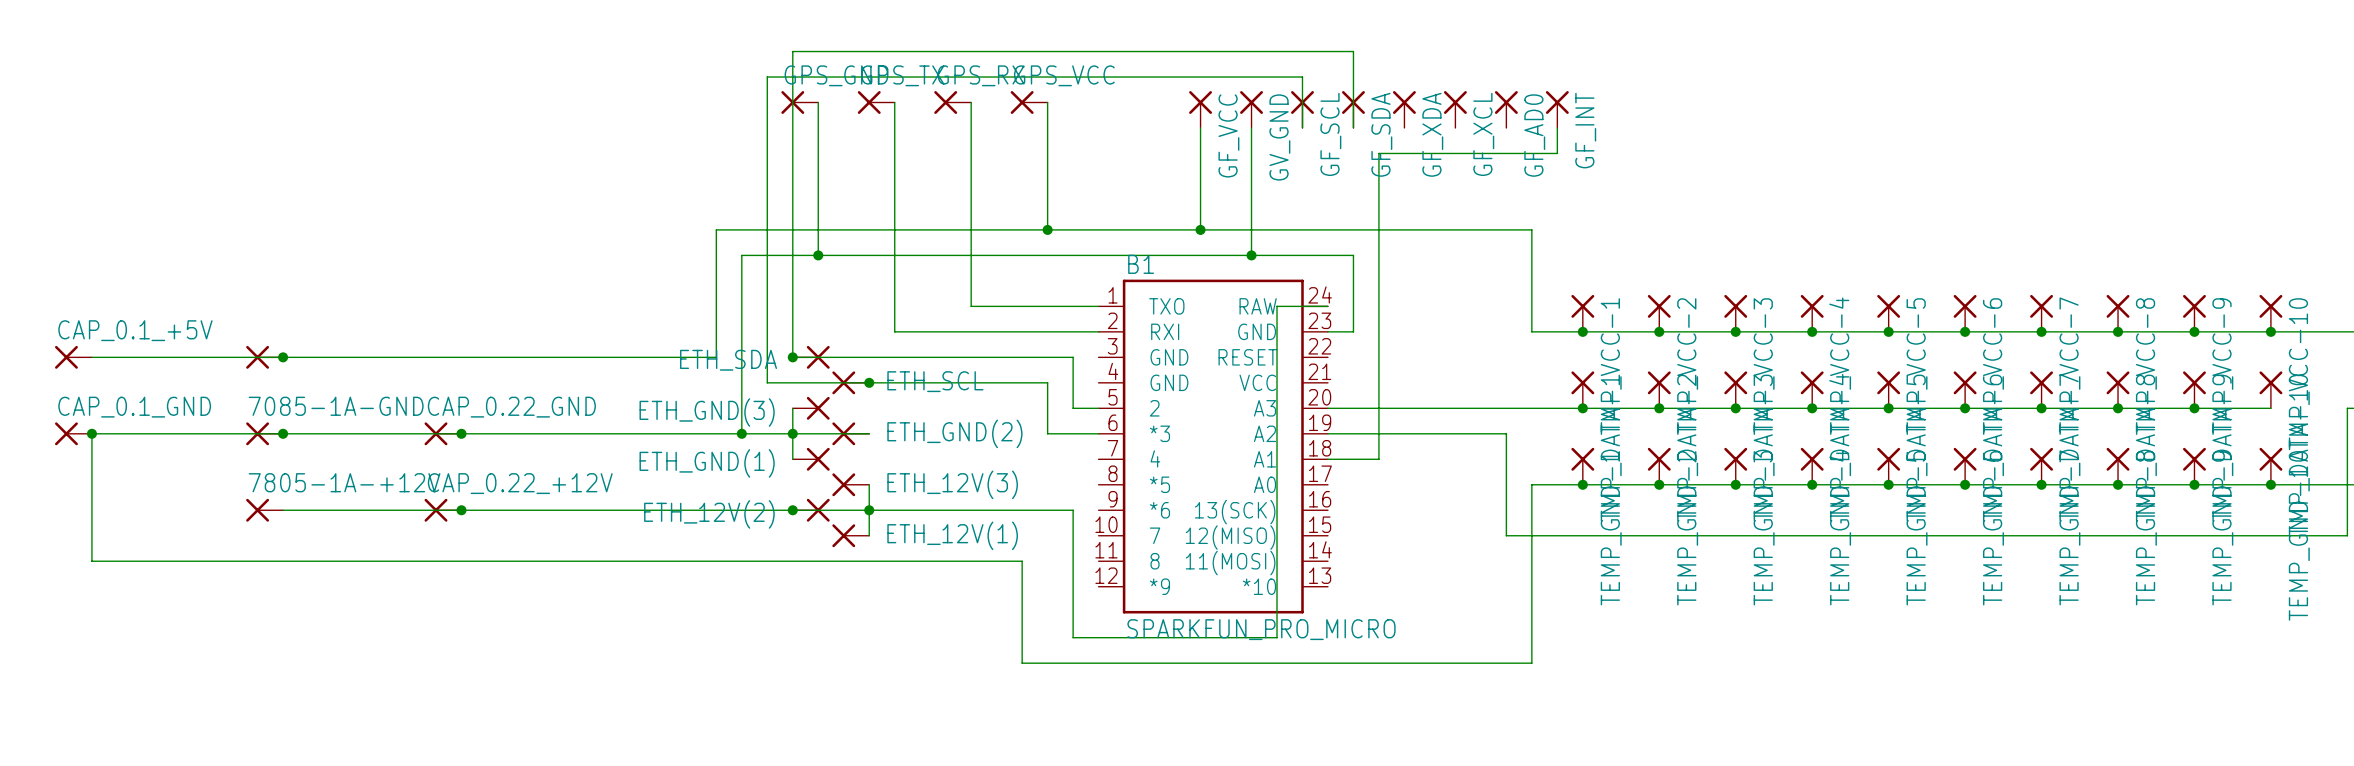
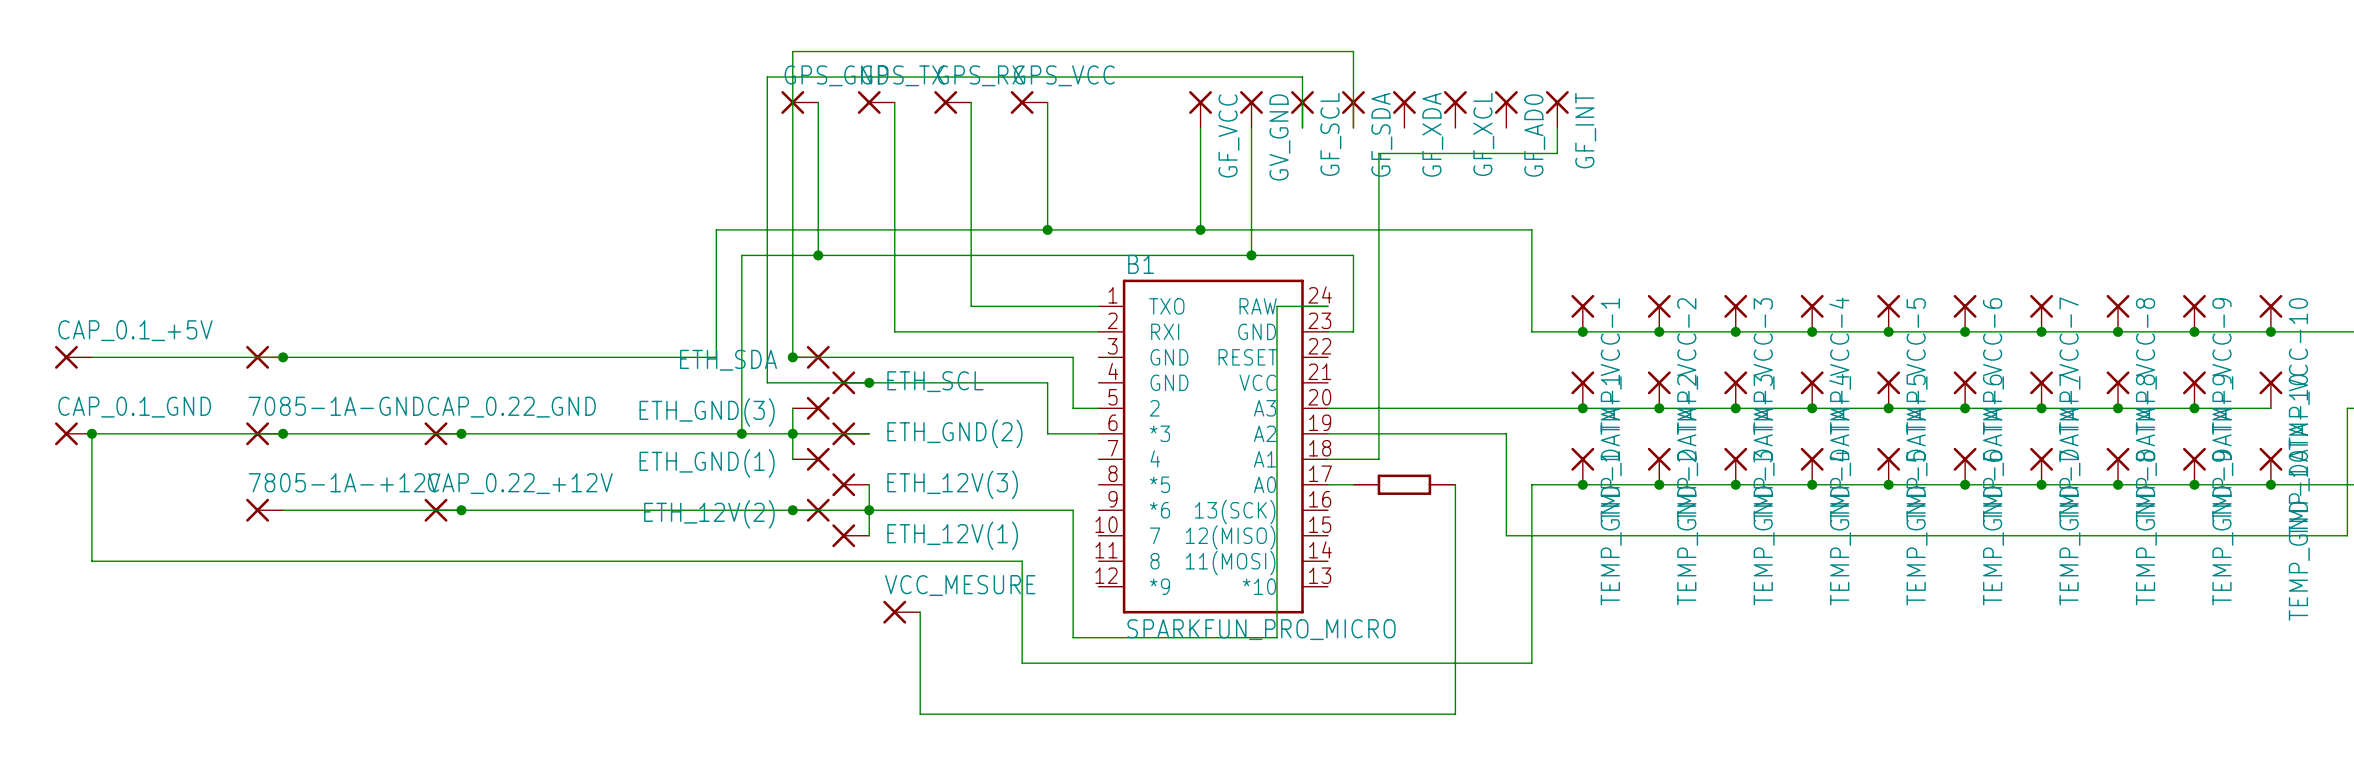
wire: none -> (1327, 484) (1353, 484)
part: none -> (1404, 484)
wire: none -> (1455, 484) (1455, 714) (920, 714) (920, 612)
VCC_MESURE: none -> (901, 612)

